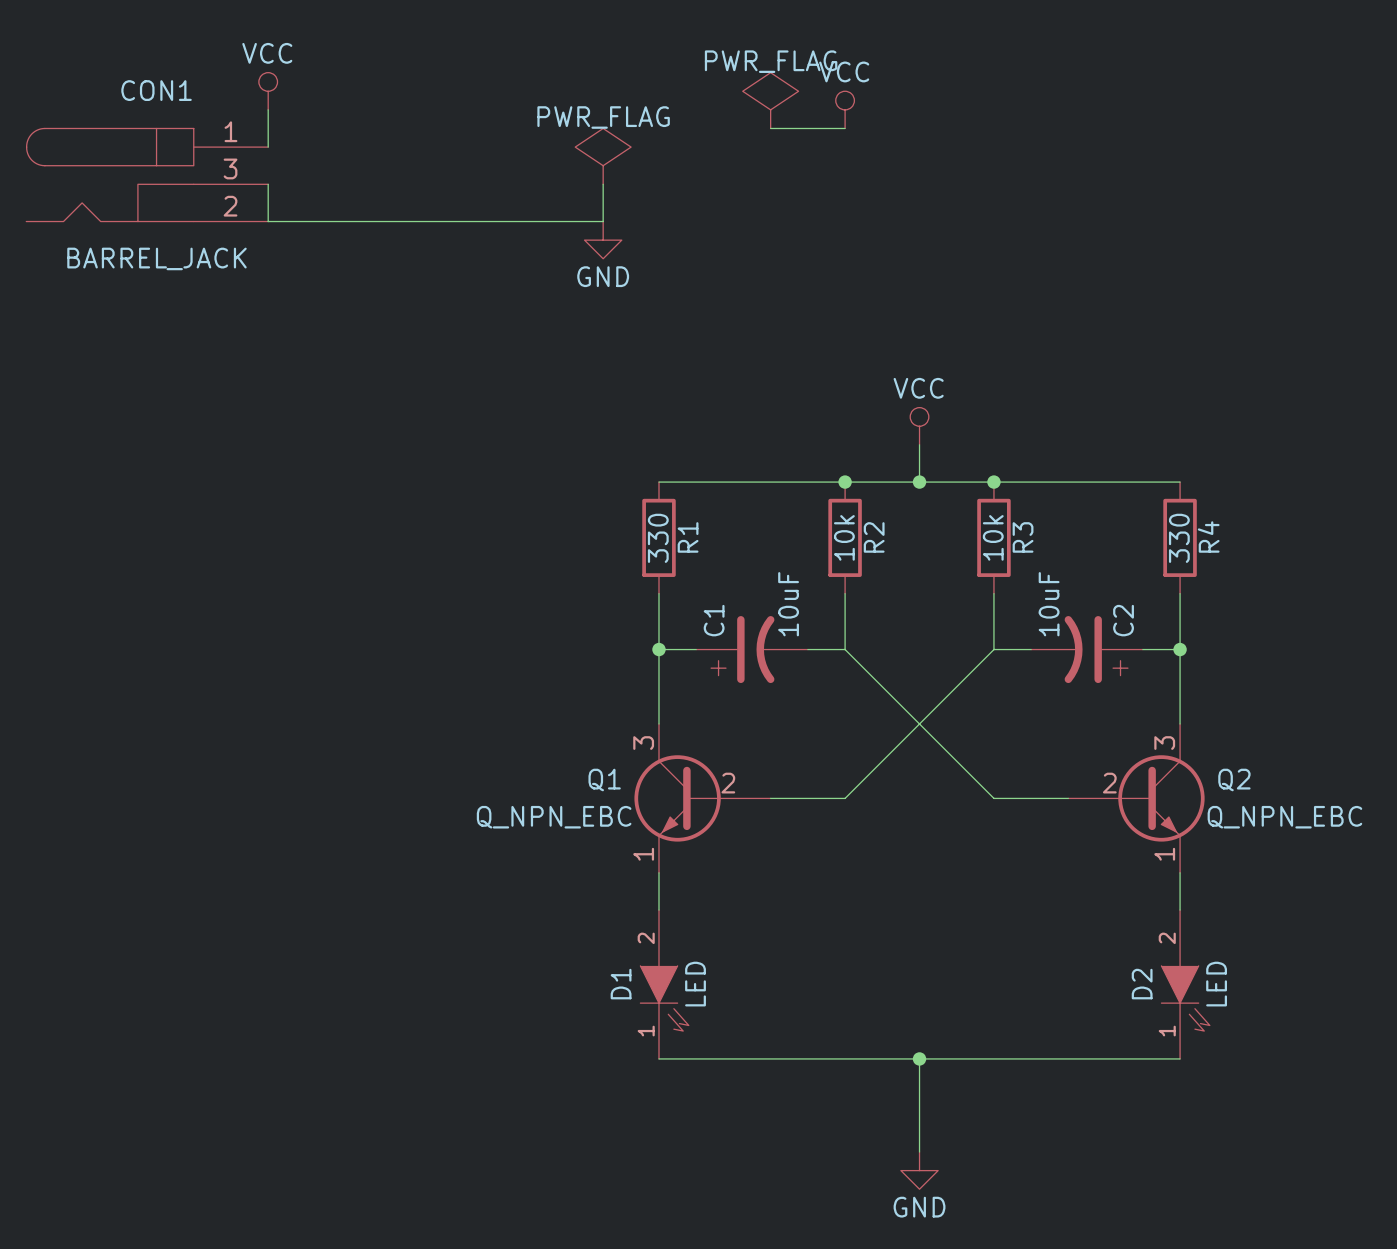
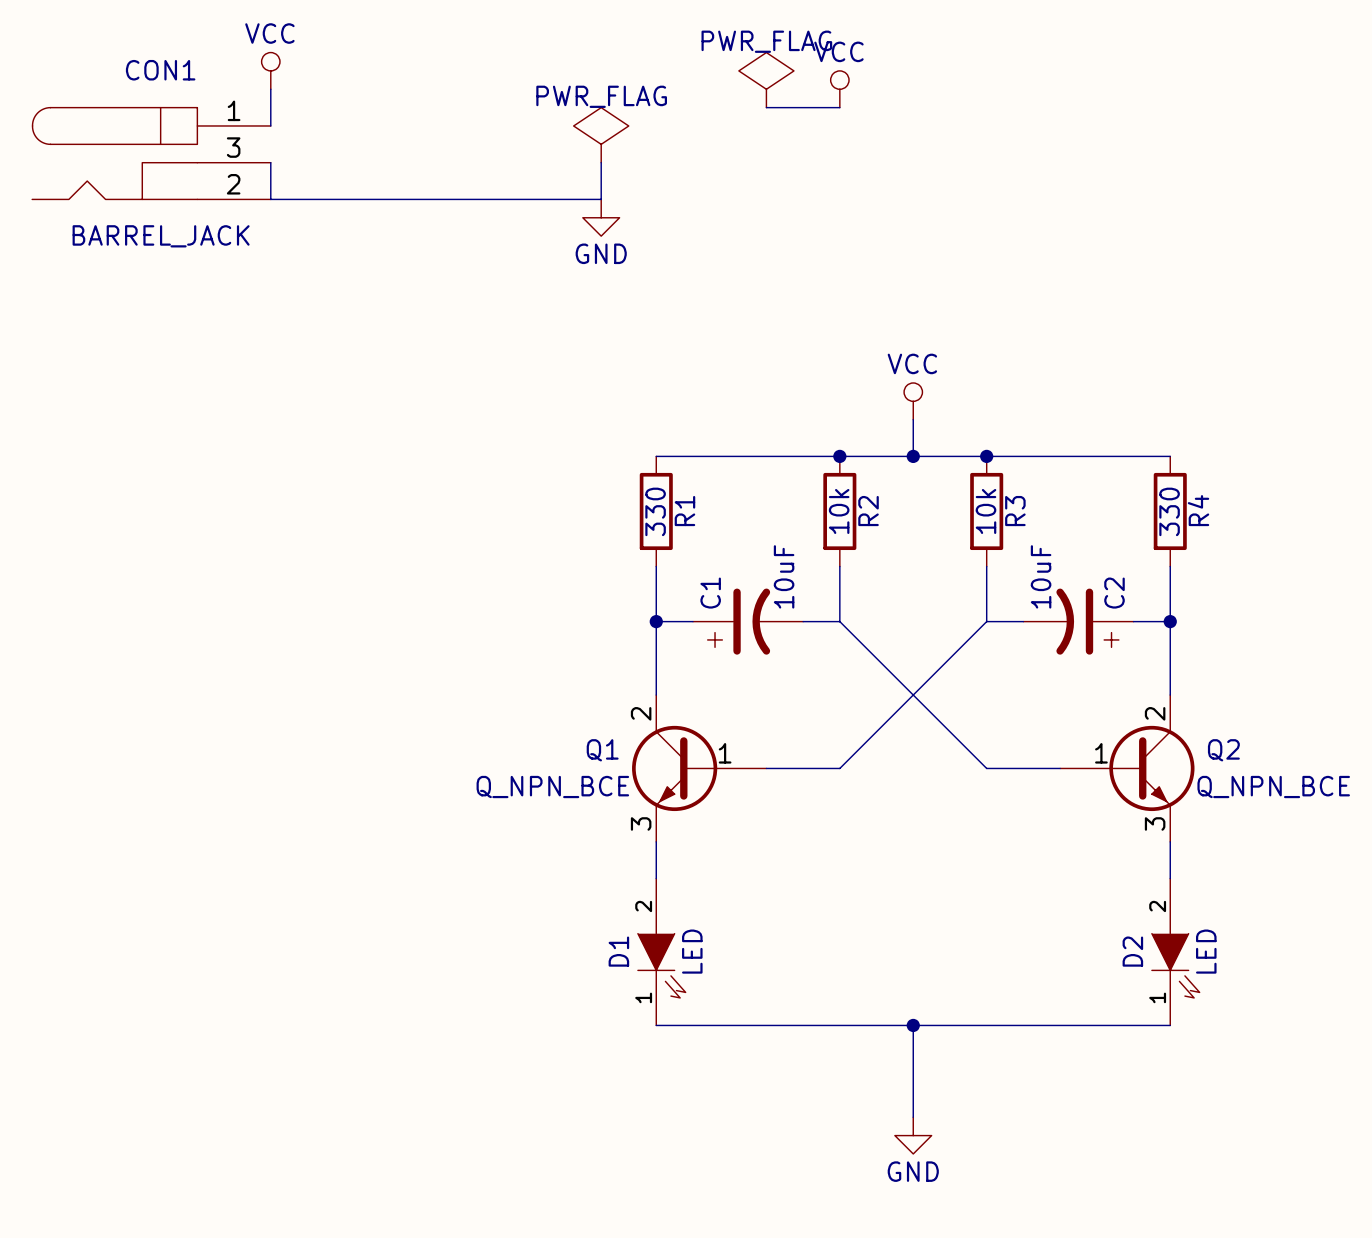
Q1 pin number: 3 (643, 743) -> 2 (641, 713)
Q2 pin number: 3 (1164, 743) -> 2 (1155, 713)
Q1 pin number: 2 (728, 783) -> 1 (725, 753)
Q2 pin number: 2 (1109, 783) -> 1 (1101, 753)
Q1 value: Q_NPN_EBC (554, 817) -> Q_NPN_BCE (552, 787)
Q2 value: Q_NPN_EBC (1284, 817) -> Q_NPN_BCE (1273, 787)
Q1 pin number: 1 (643, 854) -> 3 (641, 823)
Q2 pin number: 1 (1164, 854) -> 3 (1155, 823)

